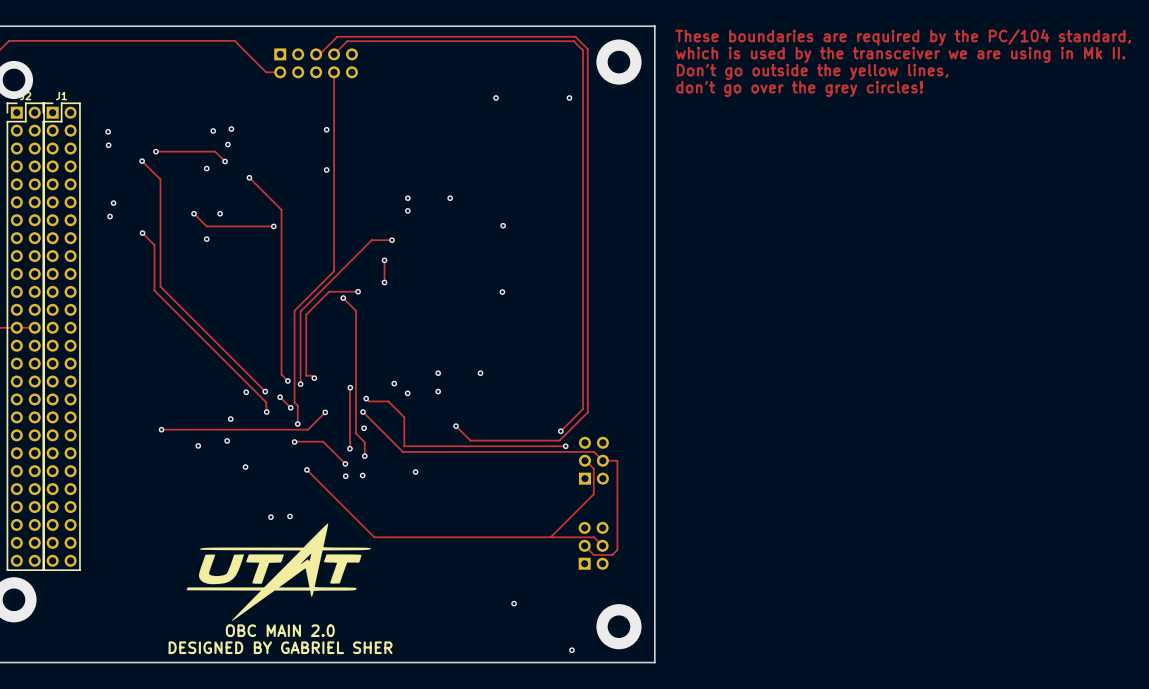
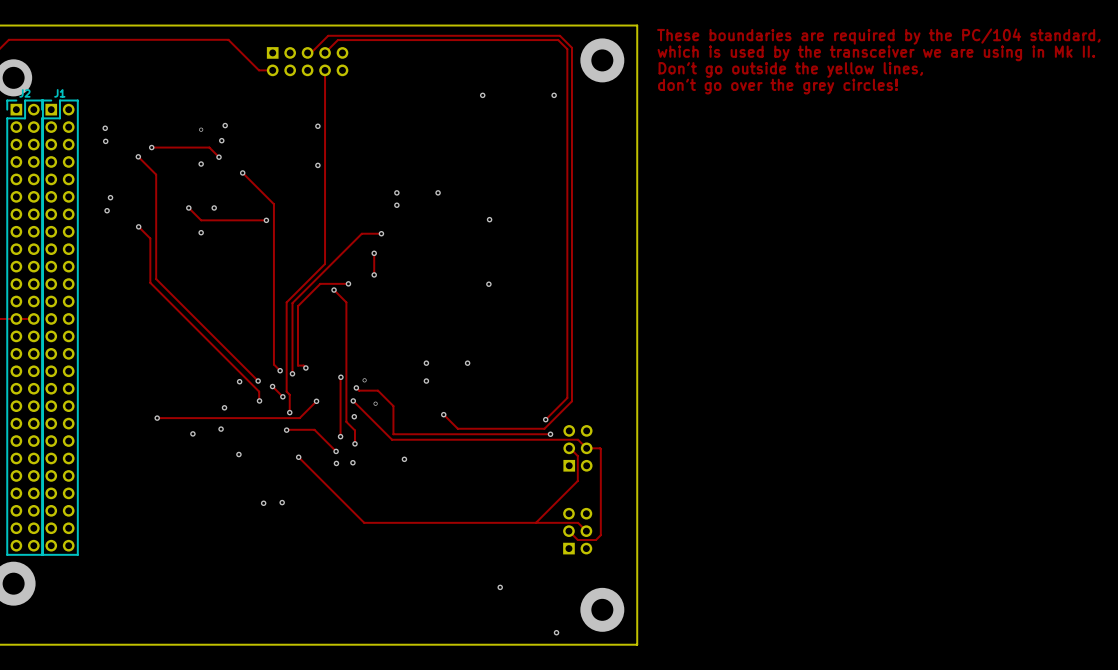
via: (213, 130) -> none
via: none -> (201, 129)
via: (394, 383) -> none
via: none -> (364, 380)
via: (407, 393) -> none
via: none -> (375, 403)
drawing: [186, 523, 371, 622] -> none
text: OBC MAIN 2.0 (280, 630) -> none
text: DESIGNED BY GABRIEL SHER (280, 647) -> none

